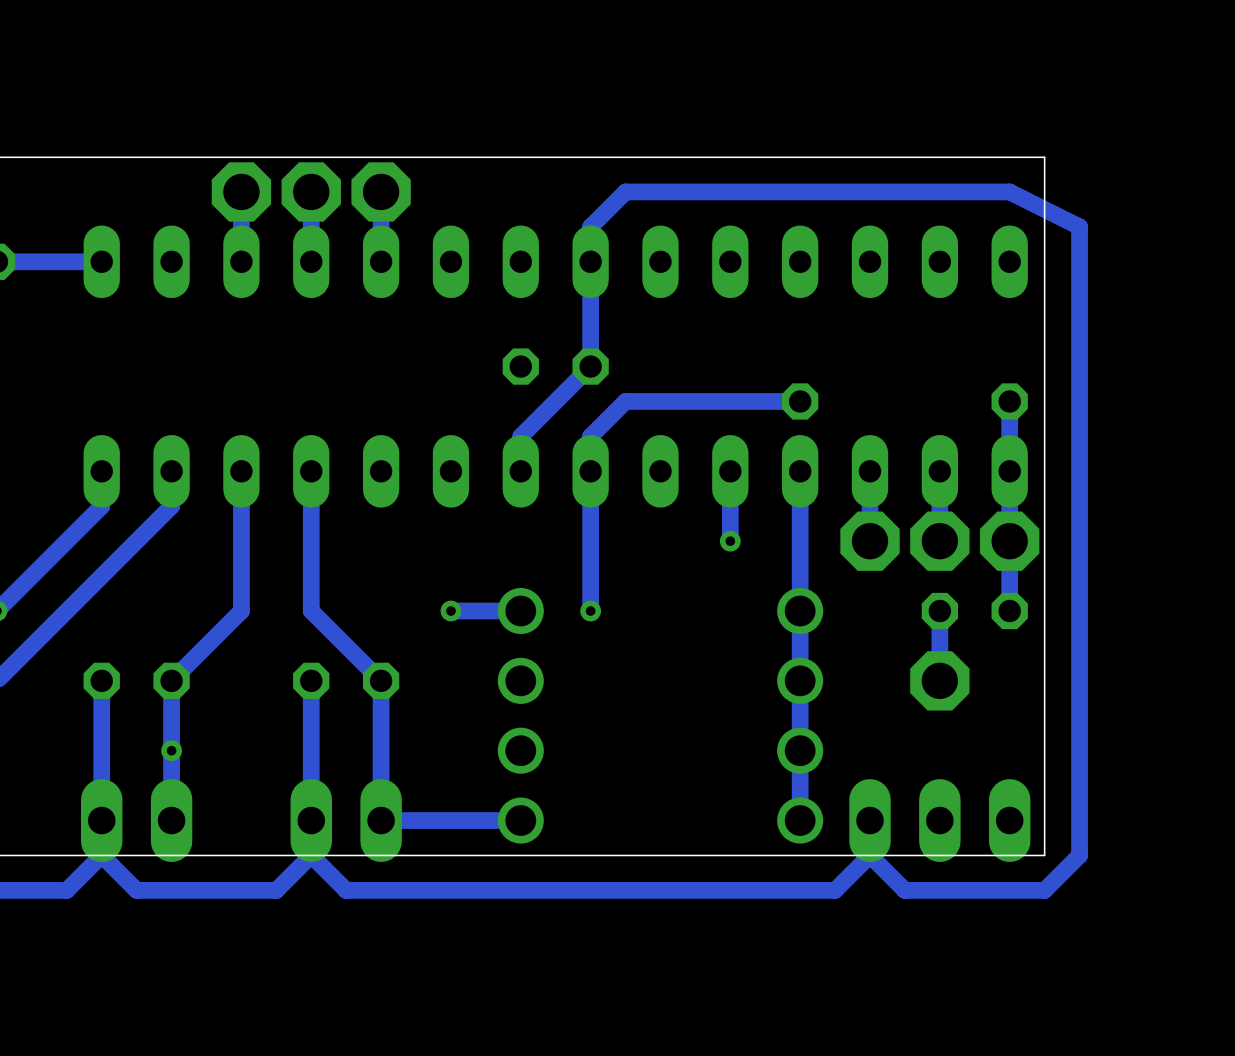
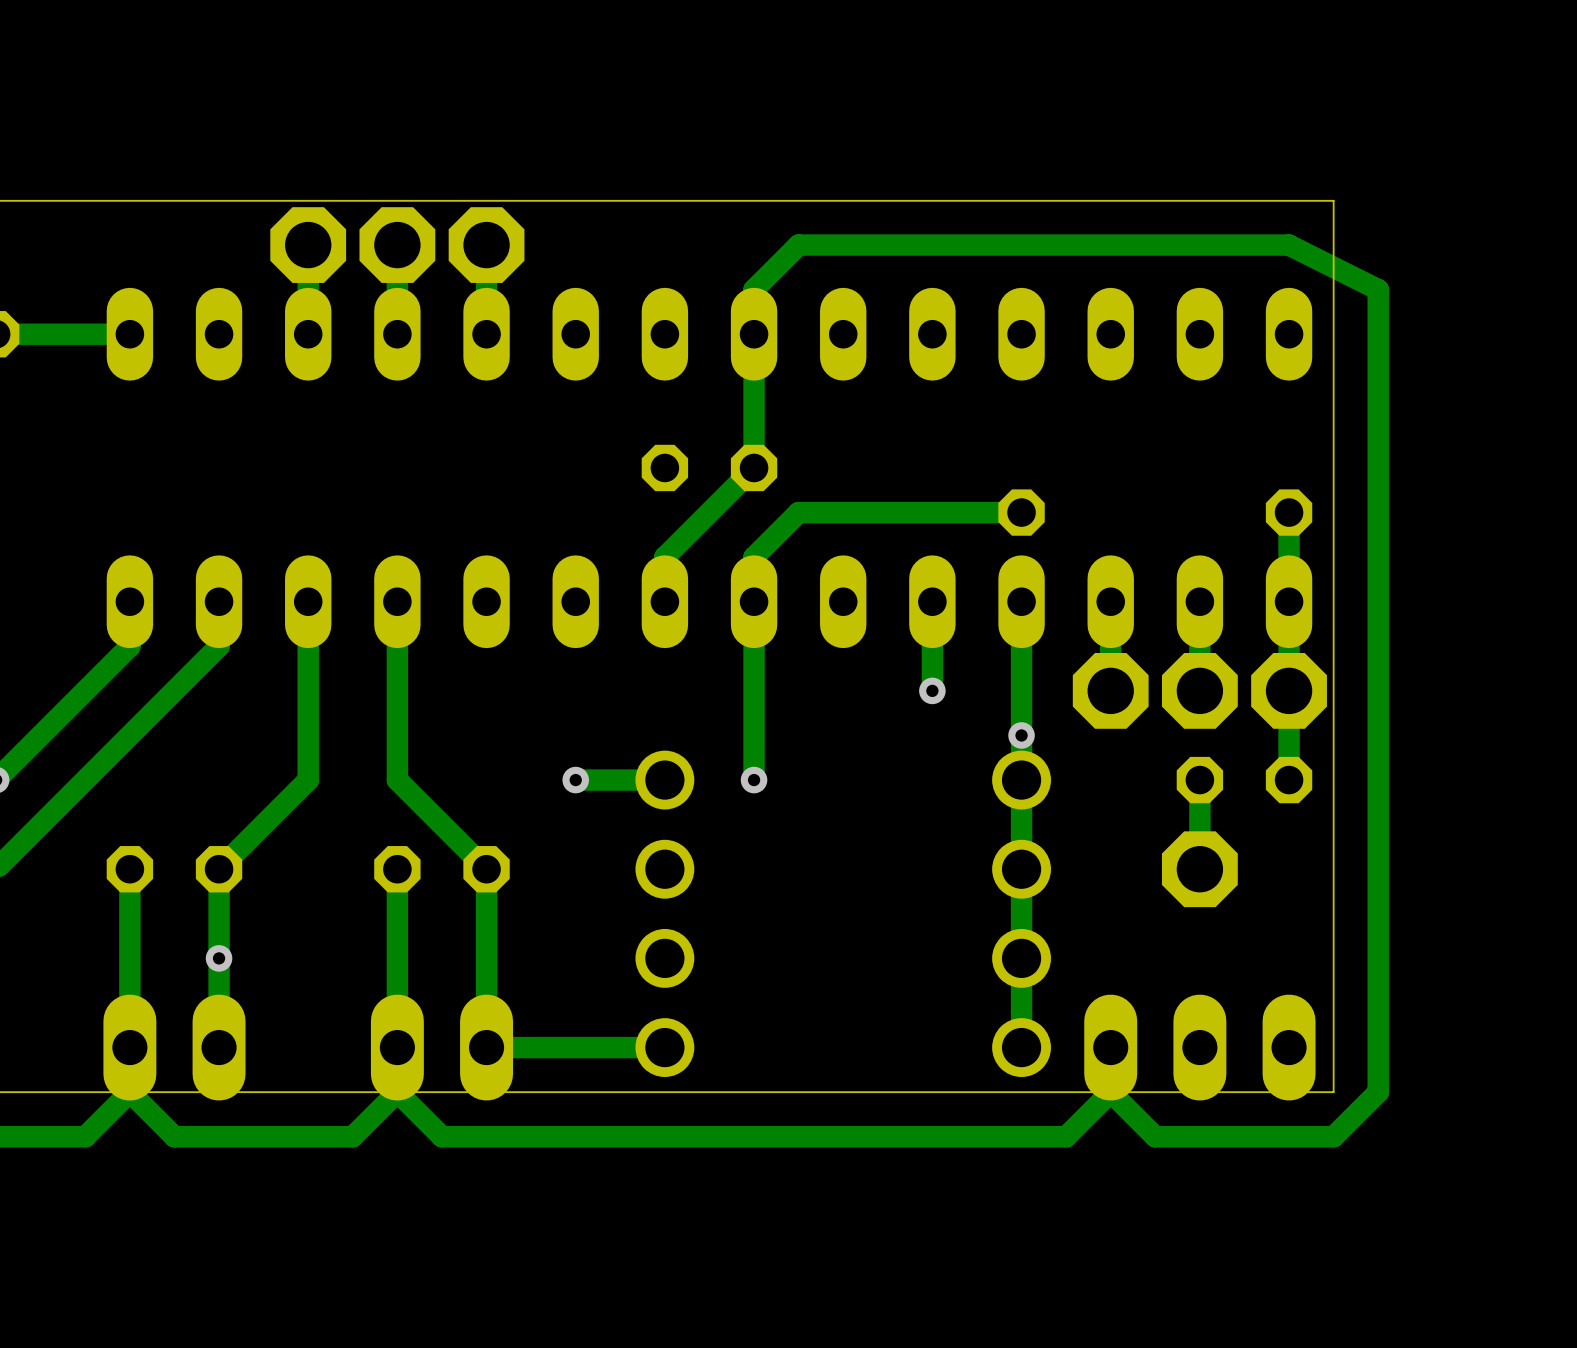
via: none -> (1021, 735)

